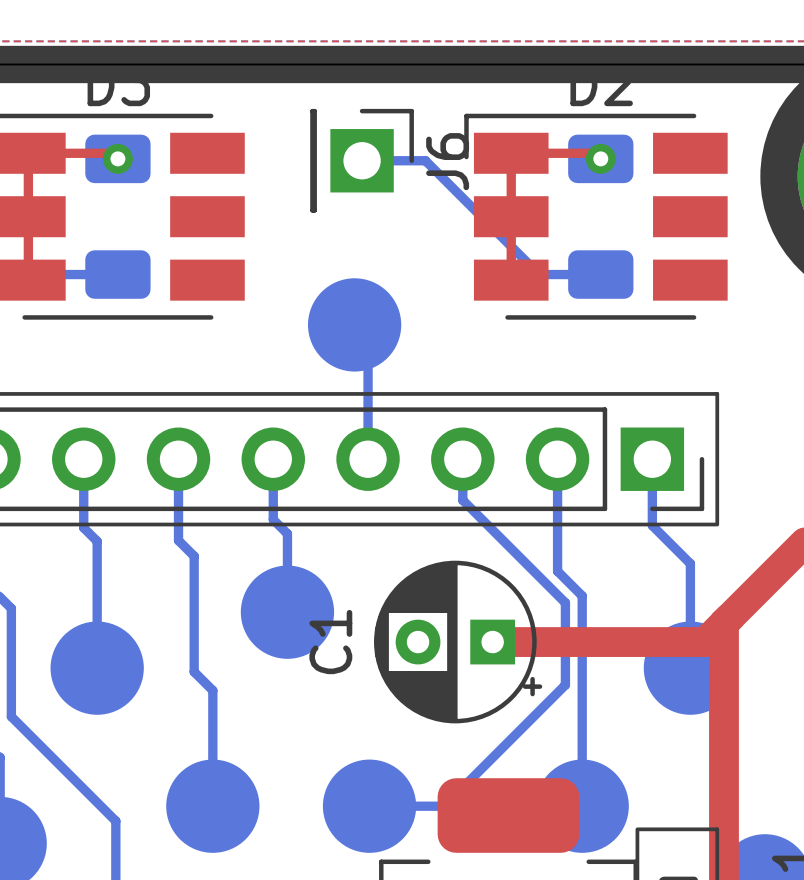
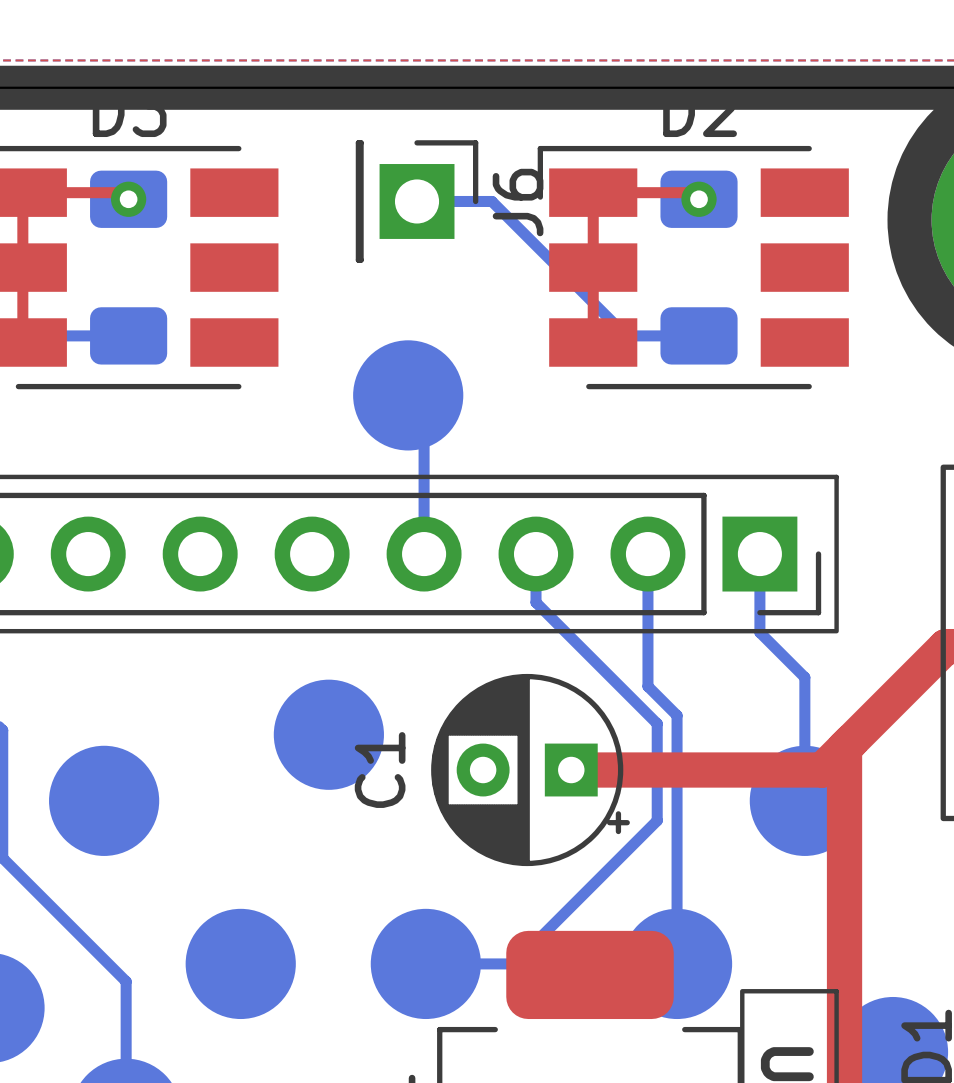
bottom track: (83, 459) (83, 527) (97, 541) (97, 668) -> none
bottom track: (178, 459) (178, 540) (194, 556) (194, 671) (212, 690) (212, 806) -> none
bottom track: (273, 459) (273, 519) (287, 533) (287, 612) -> none

